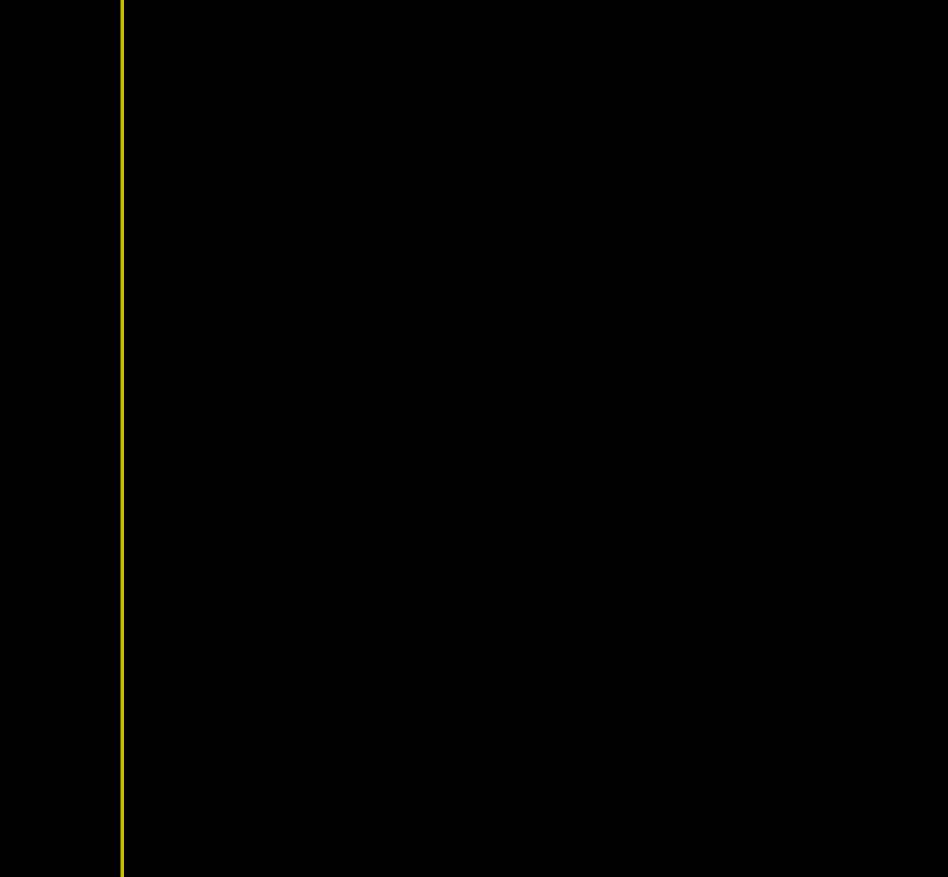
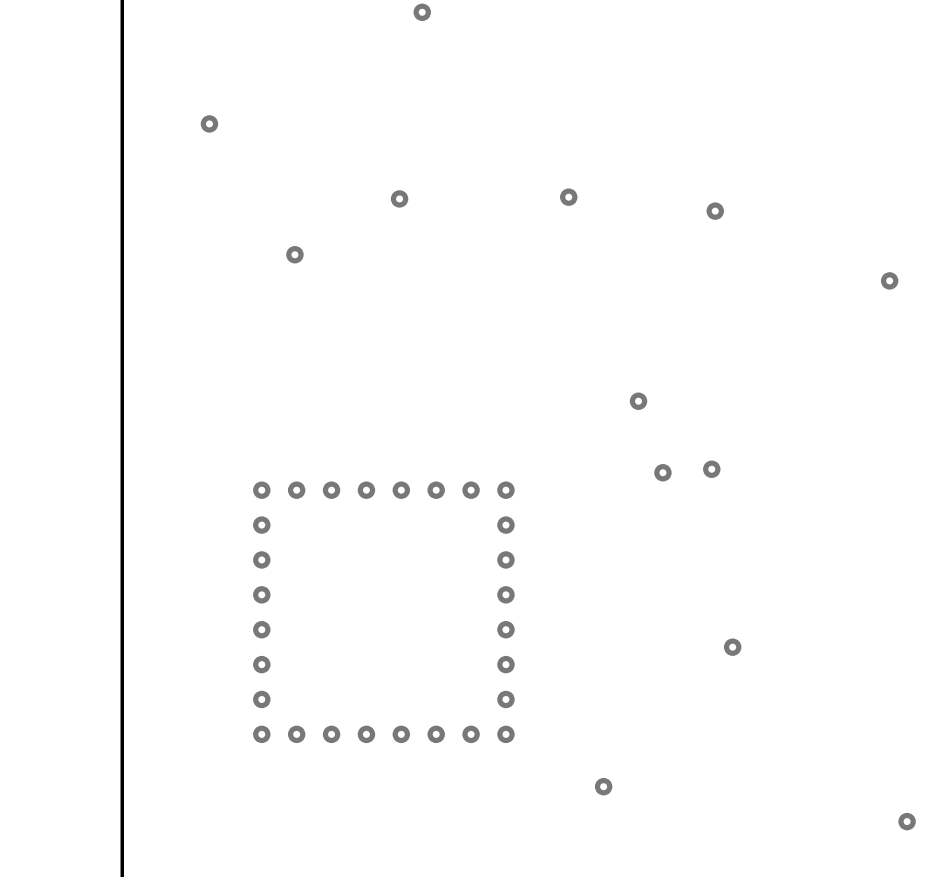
via: none -> (422, 12)
via: none -> (209, 123)
via: none -> (568, 197)
via: none -> (399, 198)
via: none -> (715, 211)
via: none -> (294, 254)
via: none -> (889, 280)
via: none -> (638, 401)
via: none -> (711, 469)
via: none -> (662, 472)
via: none -> (261, 490)
via: none -> (296, 490)
via: none -> (331, 490)
via: none -> (366, 490)
via: none -> (401, 490)
via: none -> (436, 490)
via: none -> (471, 490)
via: none -> (505, 490)
via: none -> (261, 525)
via: none -> (505, 525)
via: none -> (261, 559)
via: none -> (505, 559)
via: none -> (261, 594)
via: none -> (505, 594)
via: none -> (261, 629)
via: none -> (505, 629)
via: none -> (732, 647)
via: none -> (261, 664)
via: none -> (505, 664)
via: none -> (261, 699)
via: none -> (505, 699)
via: none -> (261, 734)
via: none -> (296, 734)
via: none -> (331, 734)
via: none -> (366, 734)
via: none -> (401, 734)
via: none -> (436, 734)
via: none -> (471, 734)
via: none -> (505, 734)
via: none -> (603, 786)
via: none -> (907, 821)

